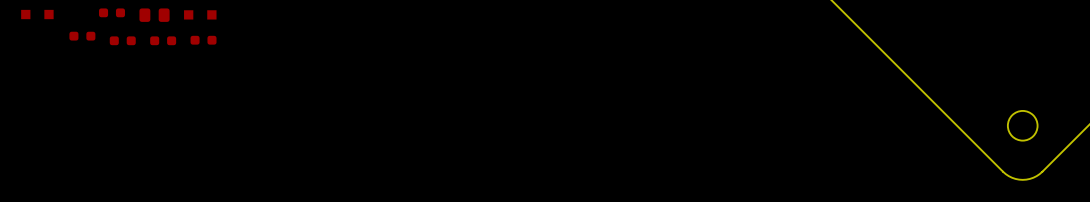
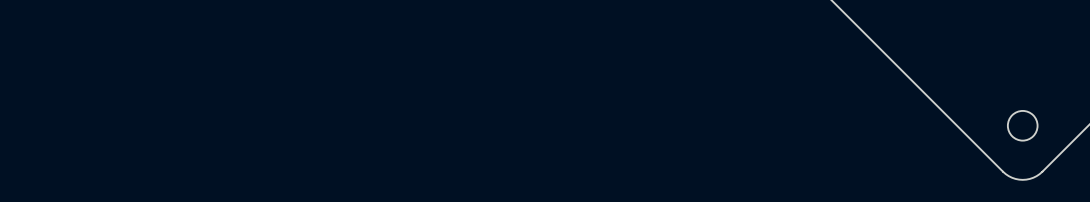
part: (112, 12) -> none
part: (37, 14) -> none
part: (200, 14) -> none
part: (154, 15) -> none
part: (82, 36) -> none
part: (122, 40) -> none
part: (163, 40) -> none
part: (203, 40) -> none

